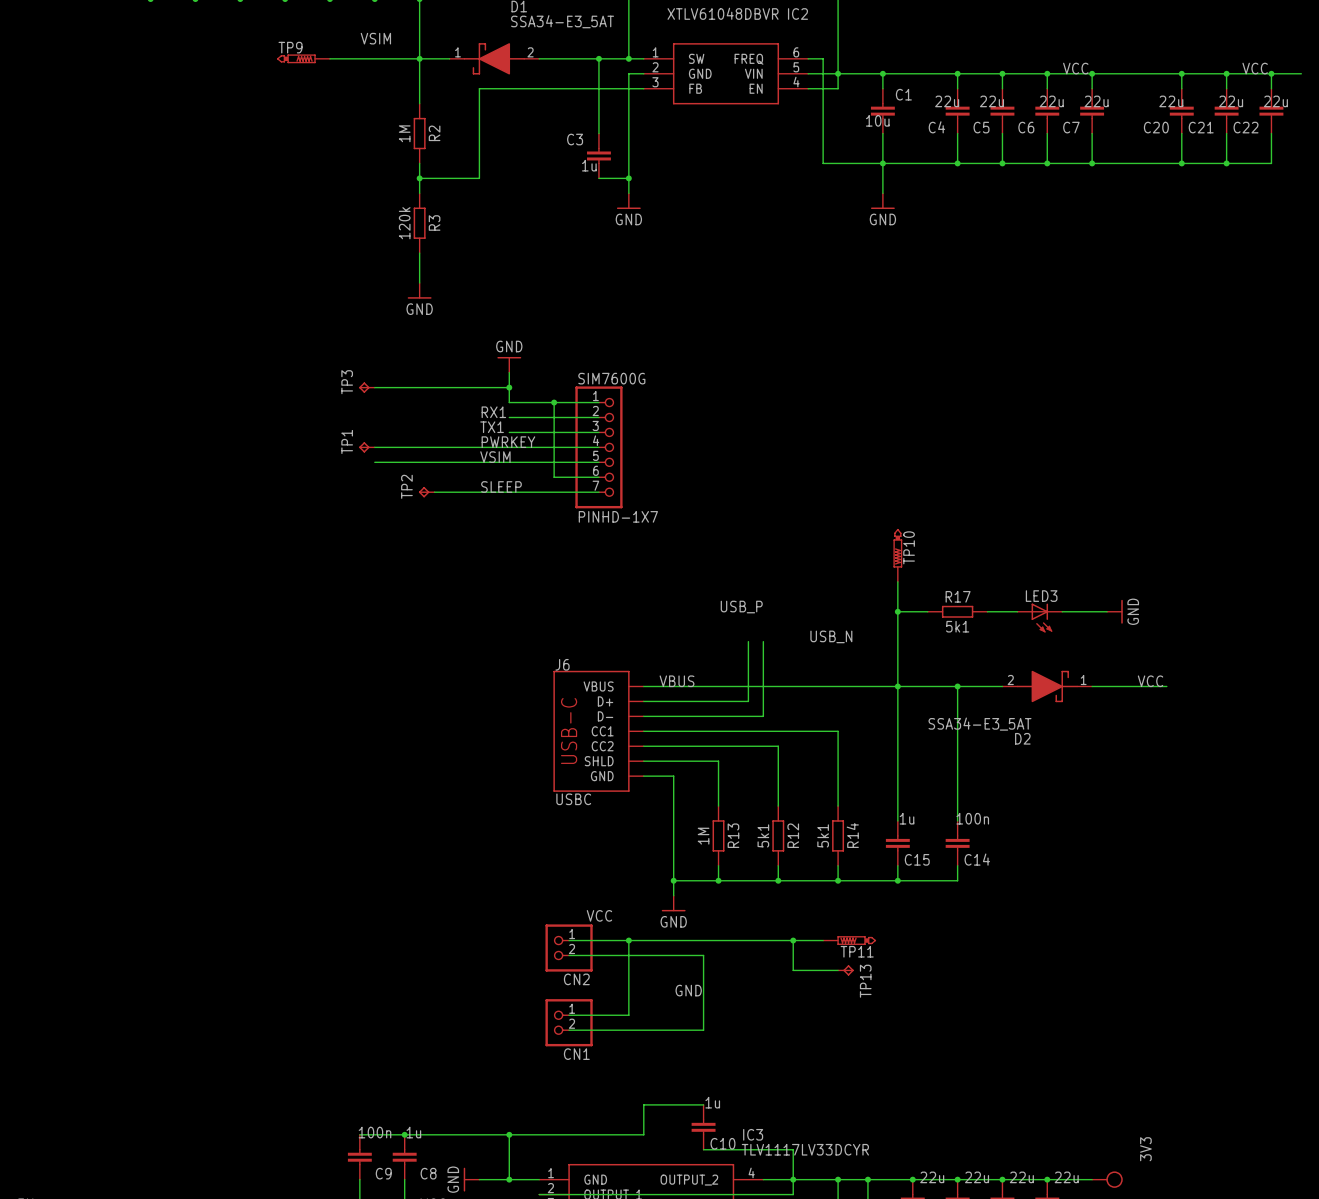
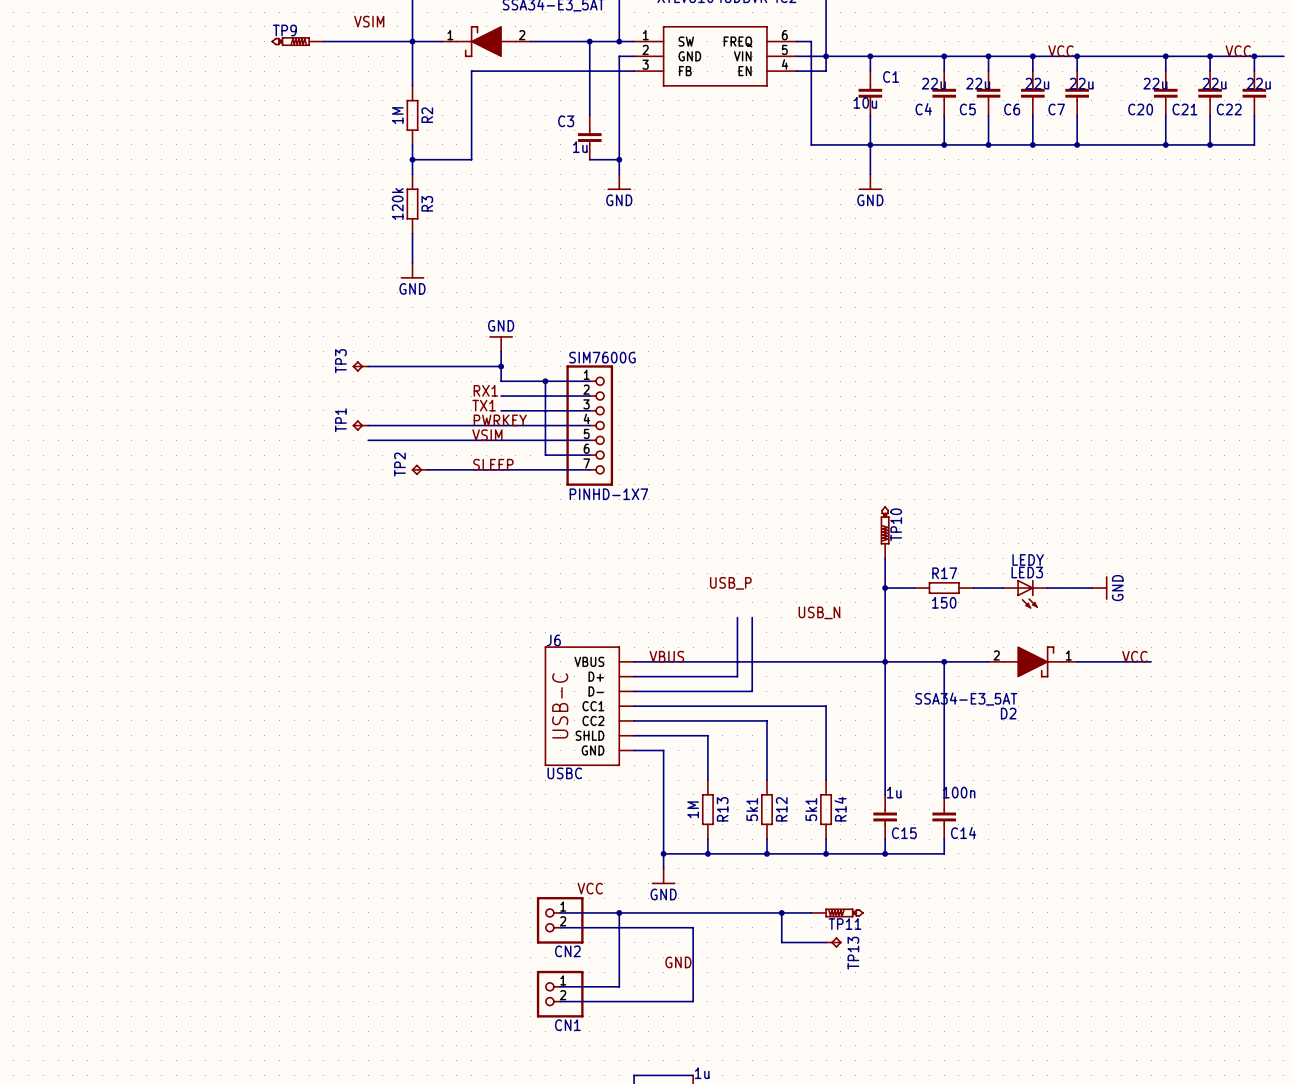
LED3 value: none -> LEDY (1028, 559)
R17 value: 5k1 (957, 626) -> 150 (944, 602)

